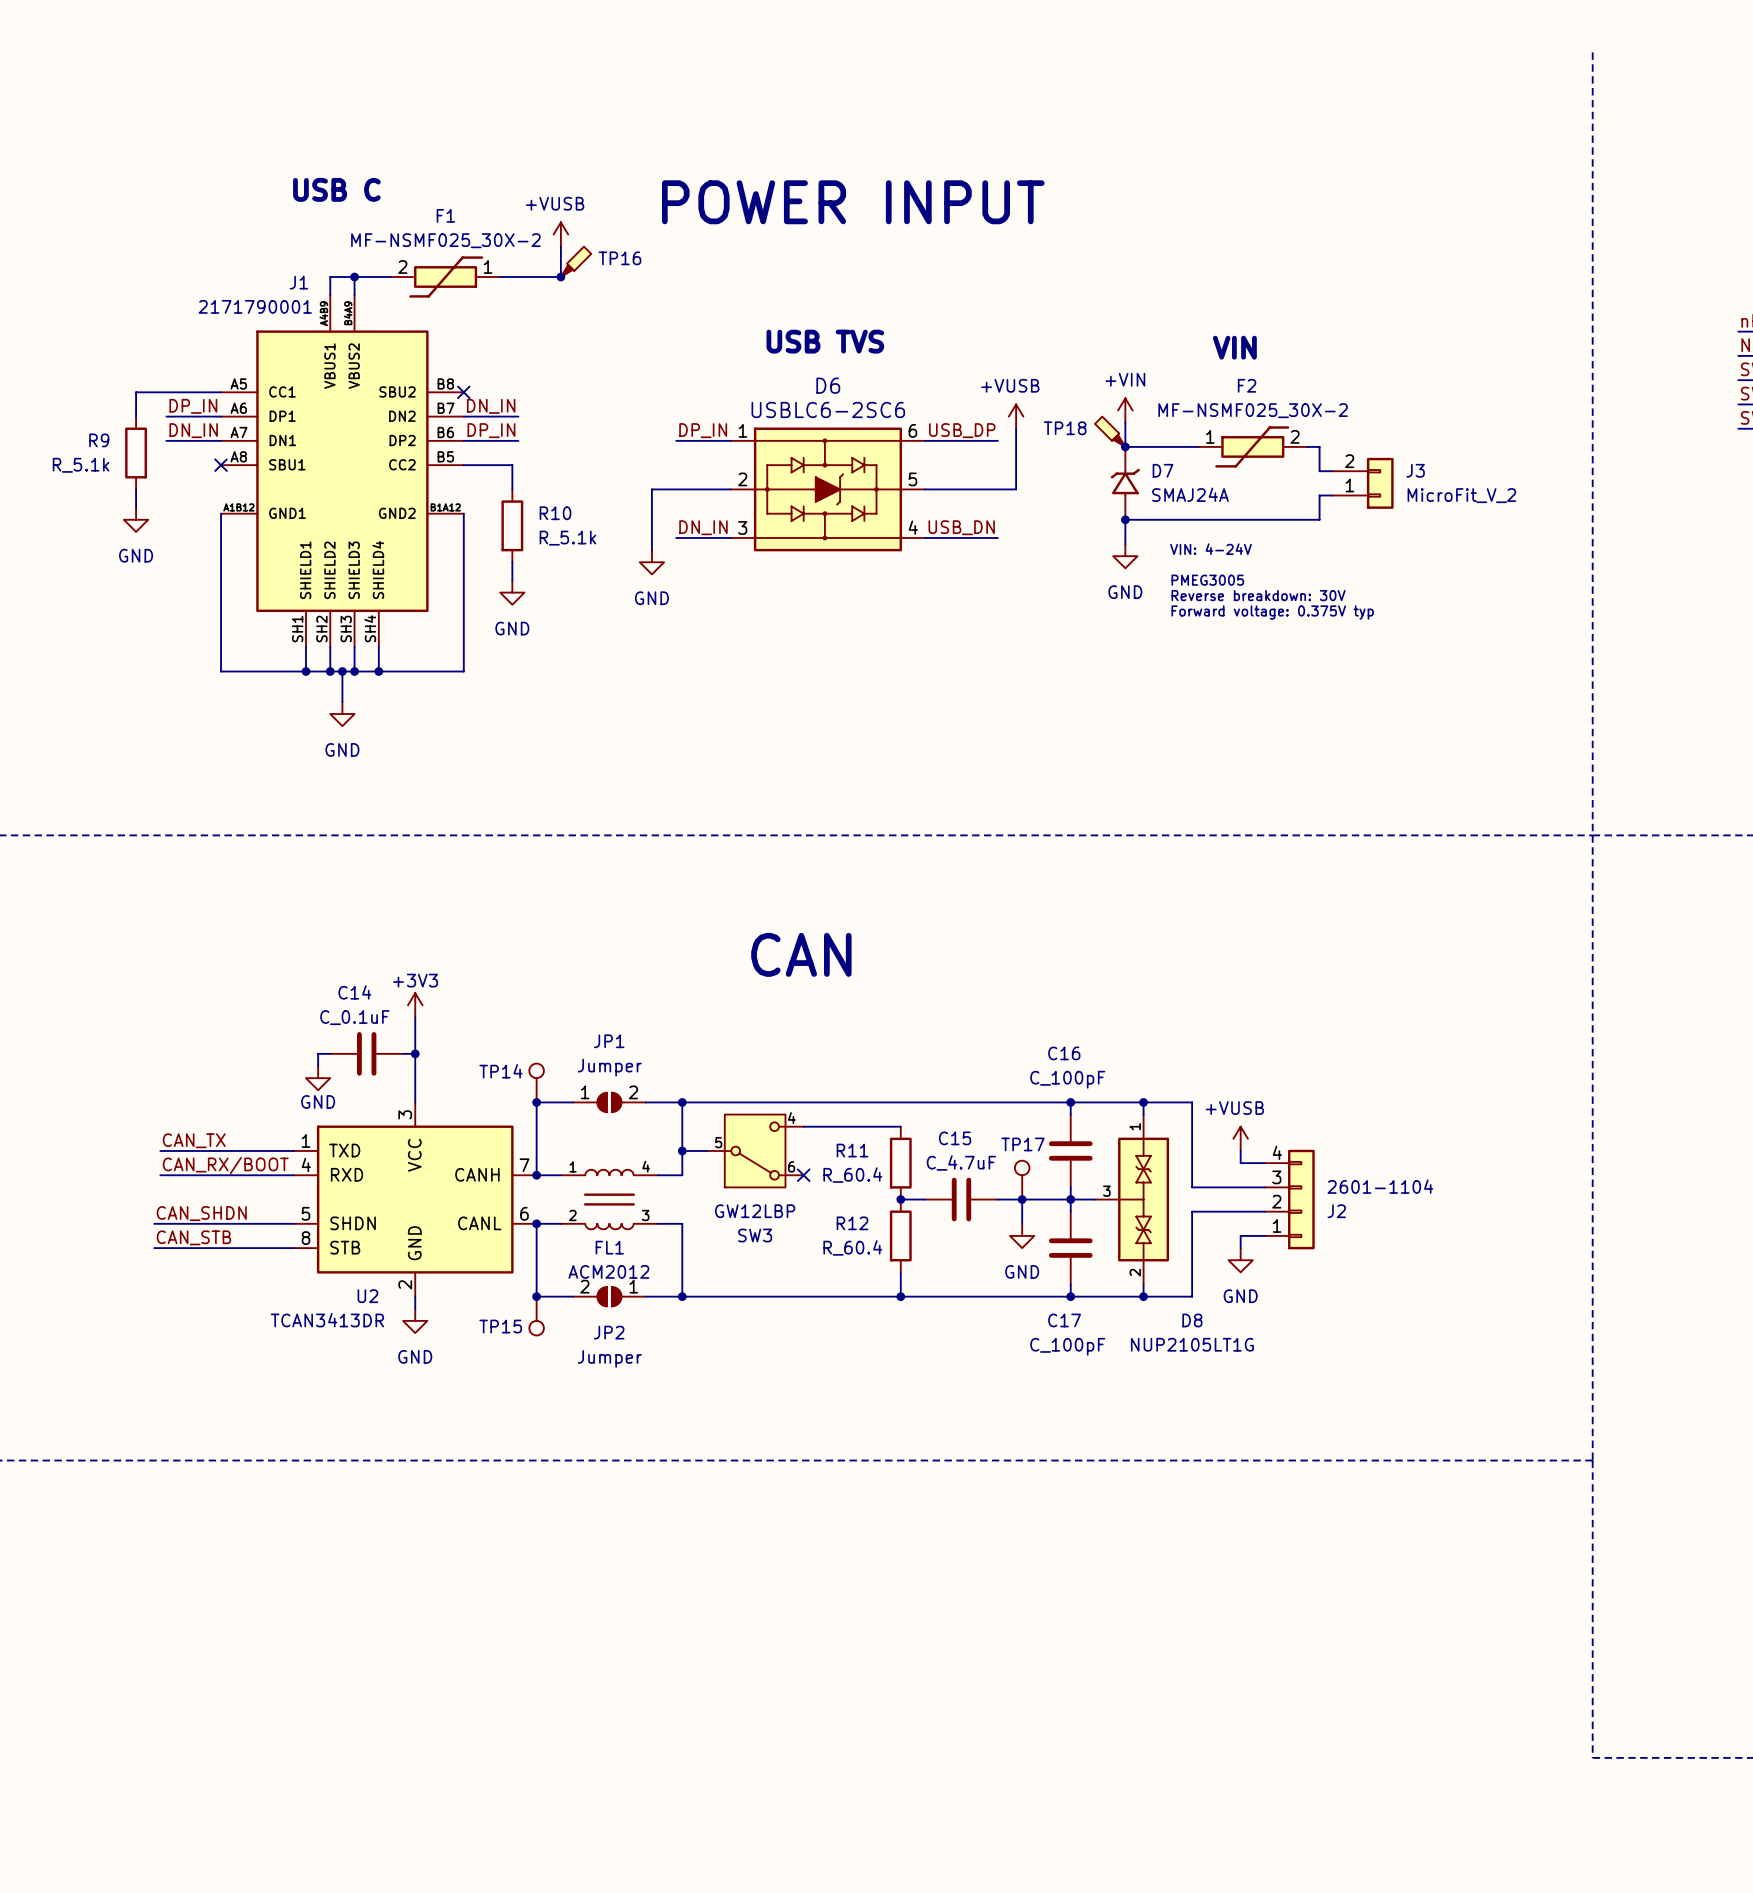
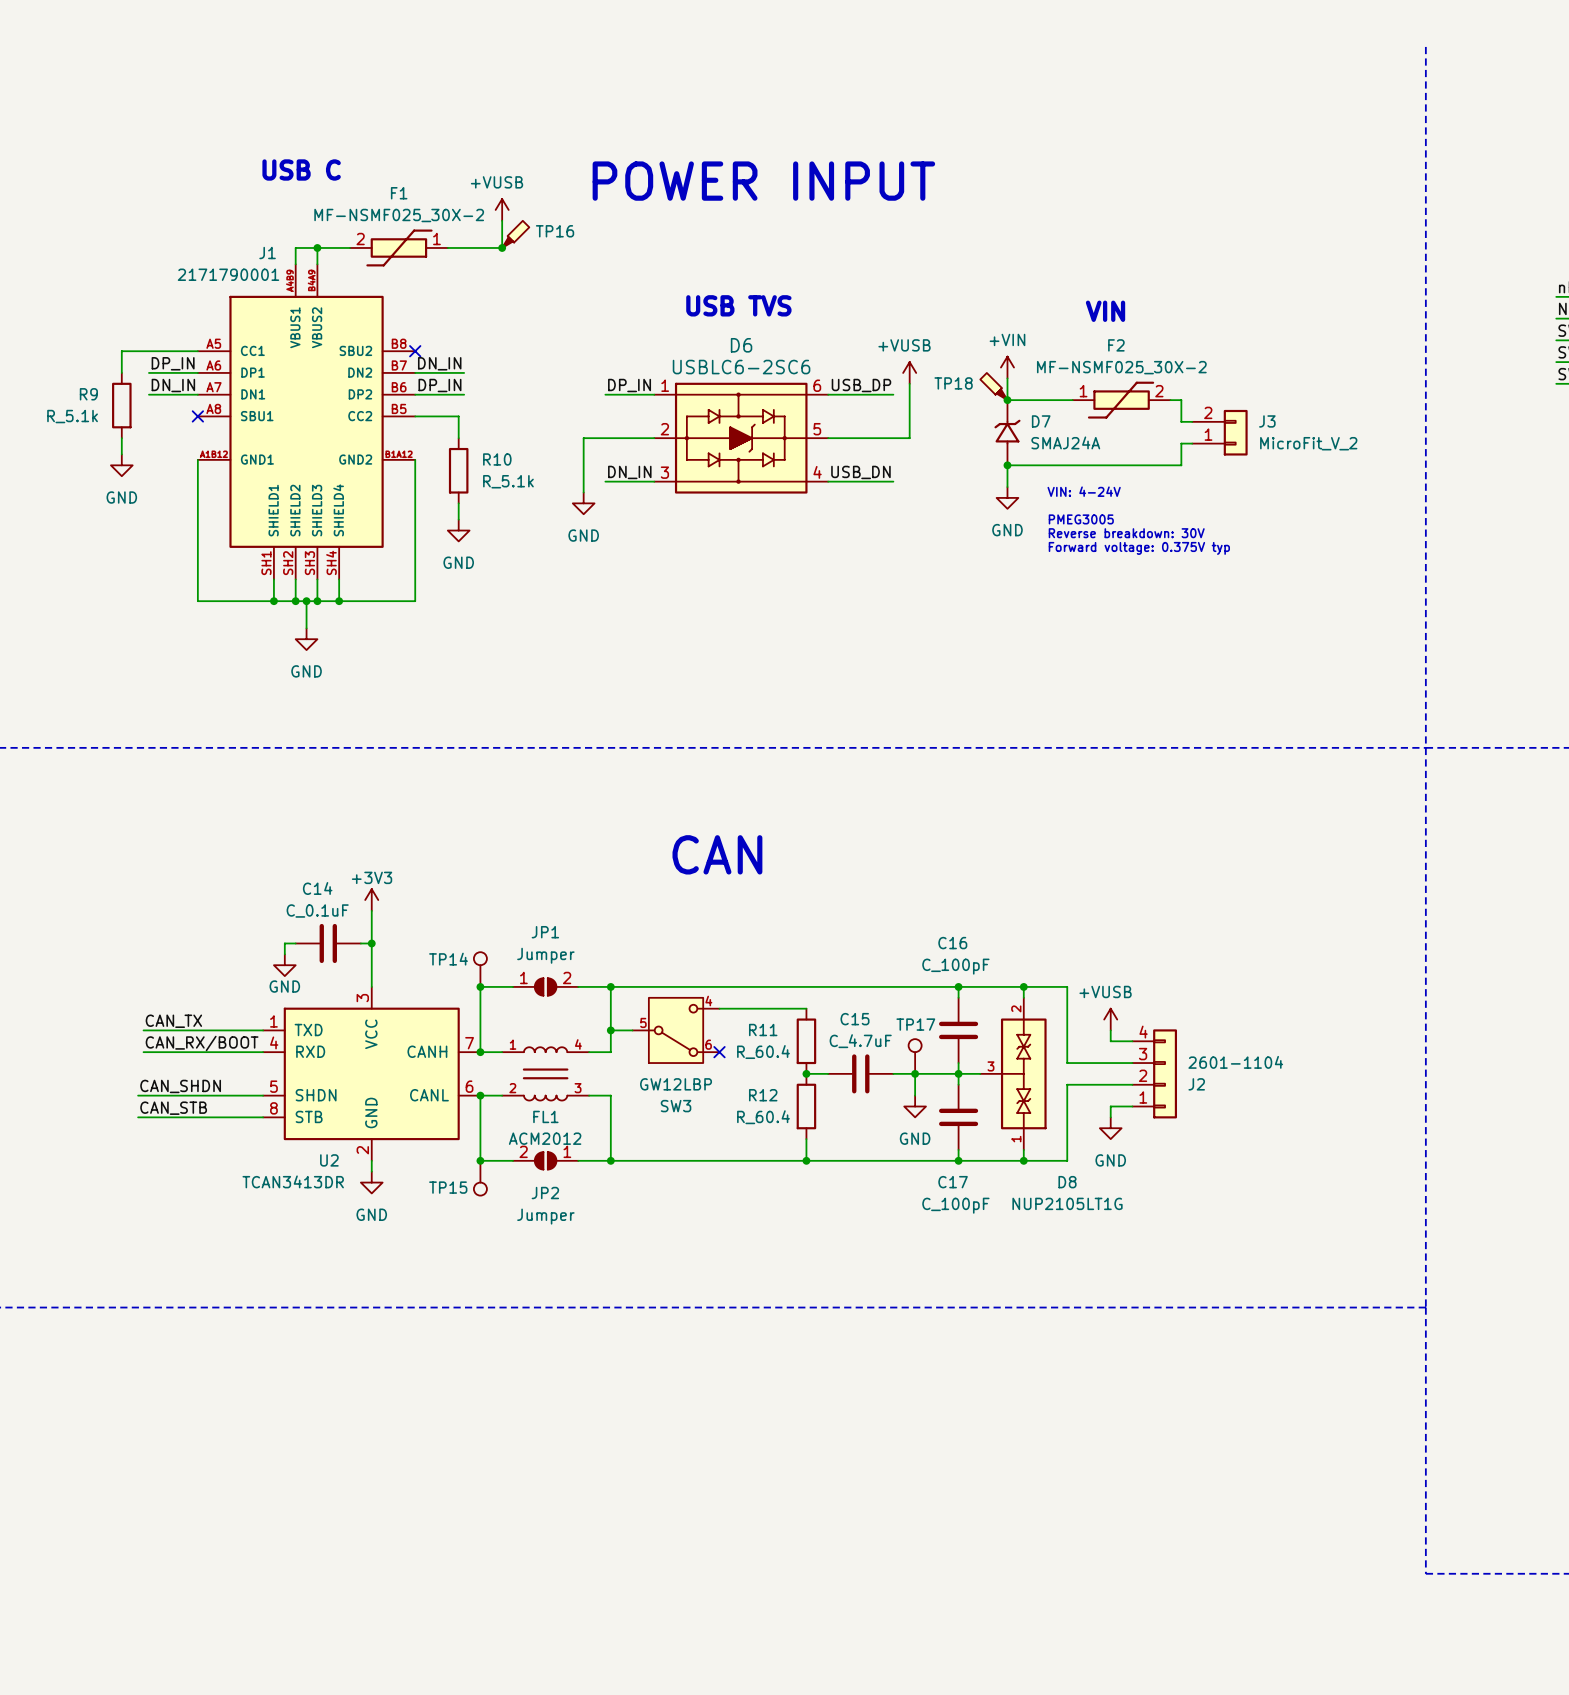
D8 flip: as is (1143, 1199) -> up-down (1023, 1073)

